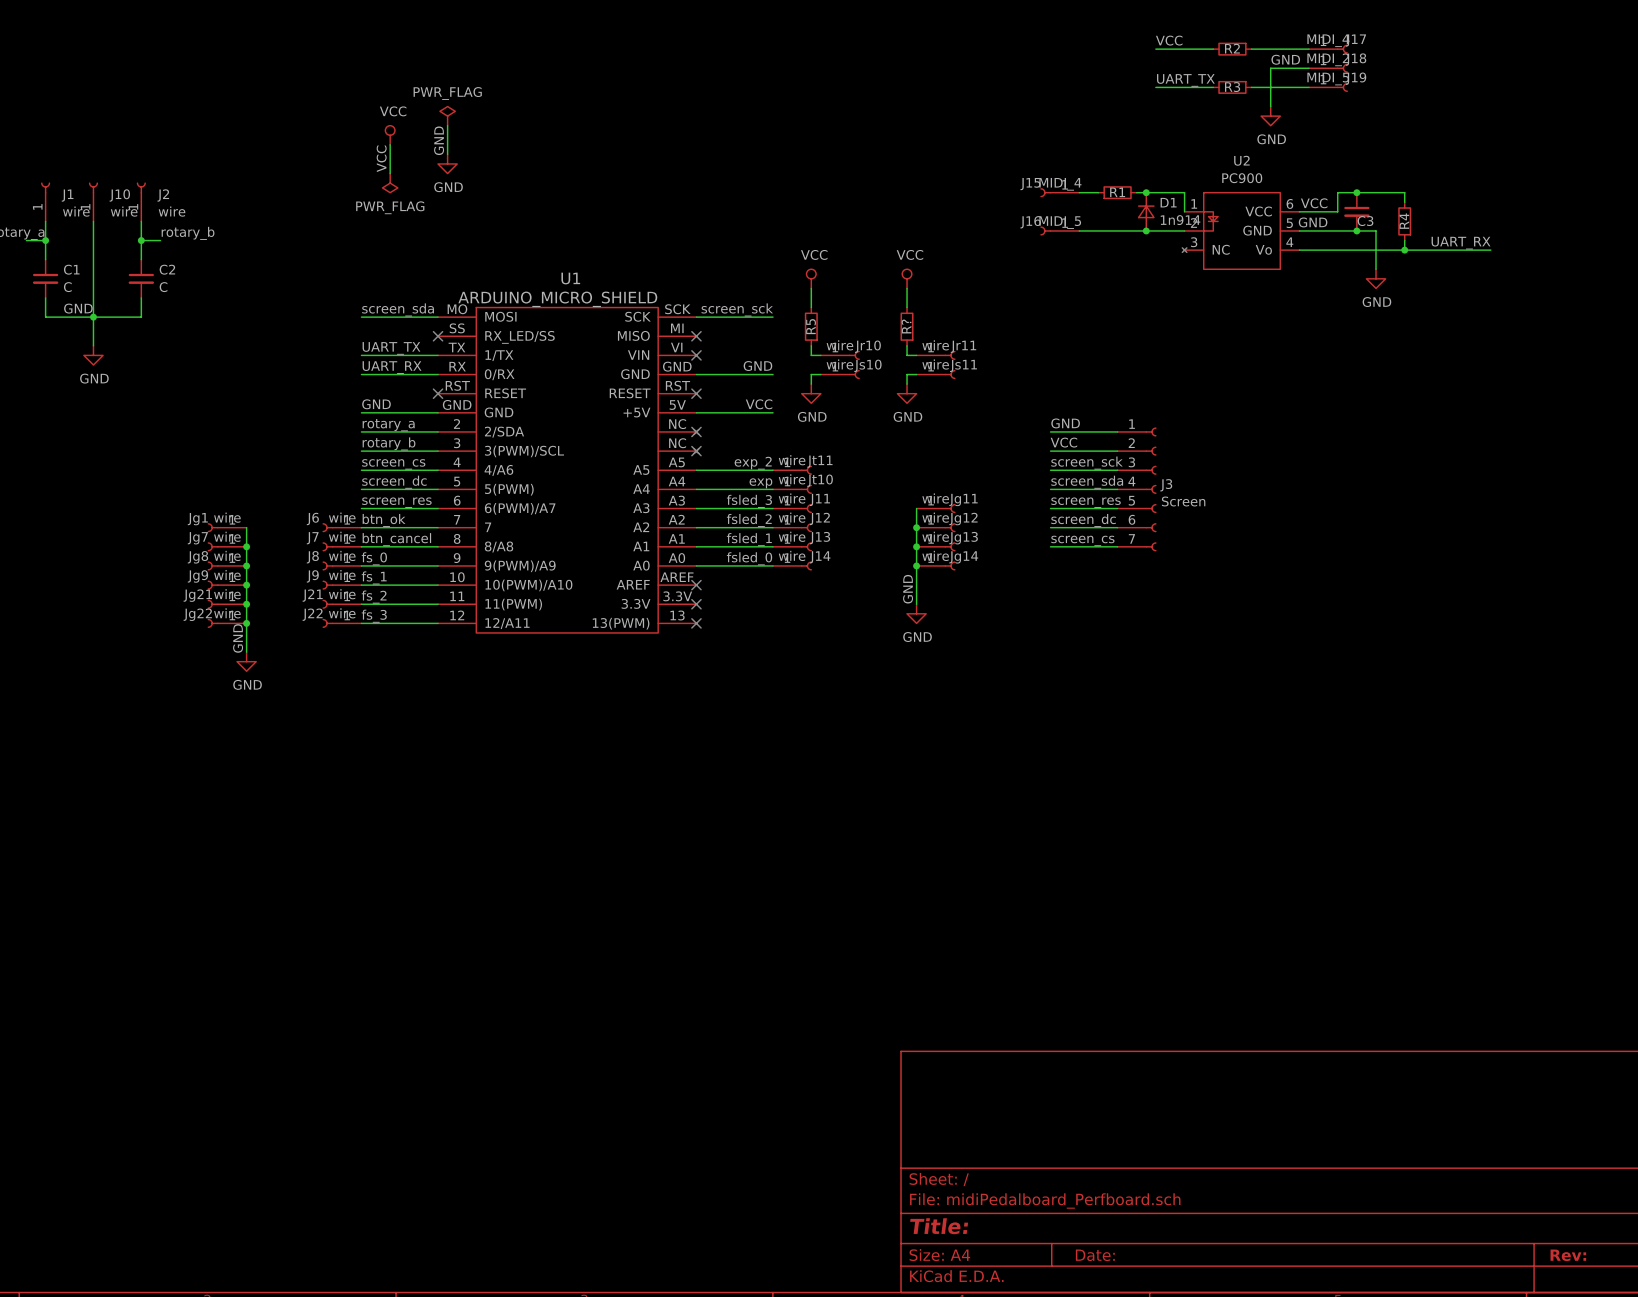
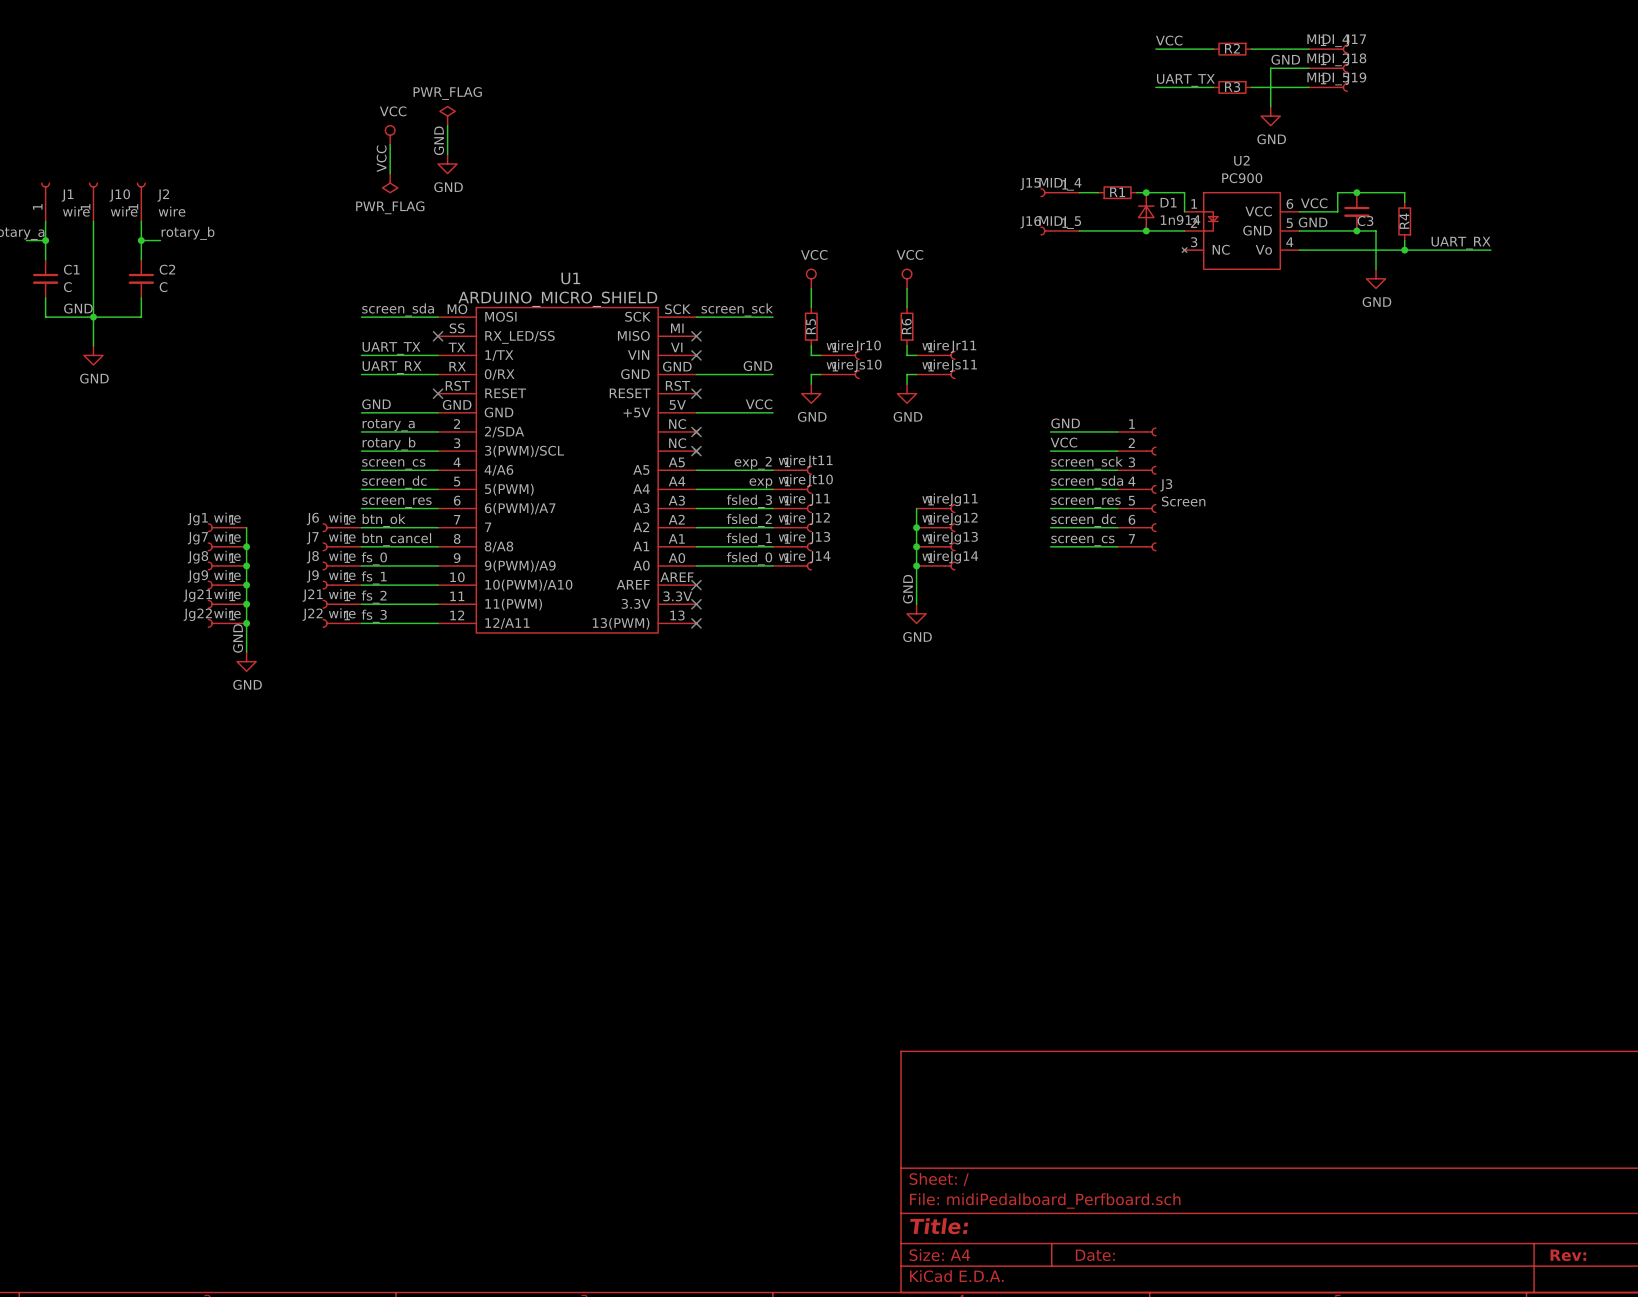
R? name: R? (906, 326) -> R6 (906, 326)

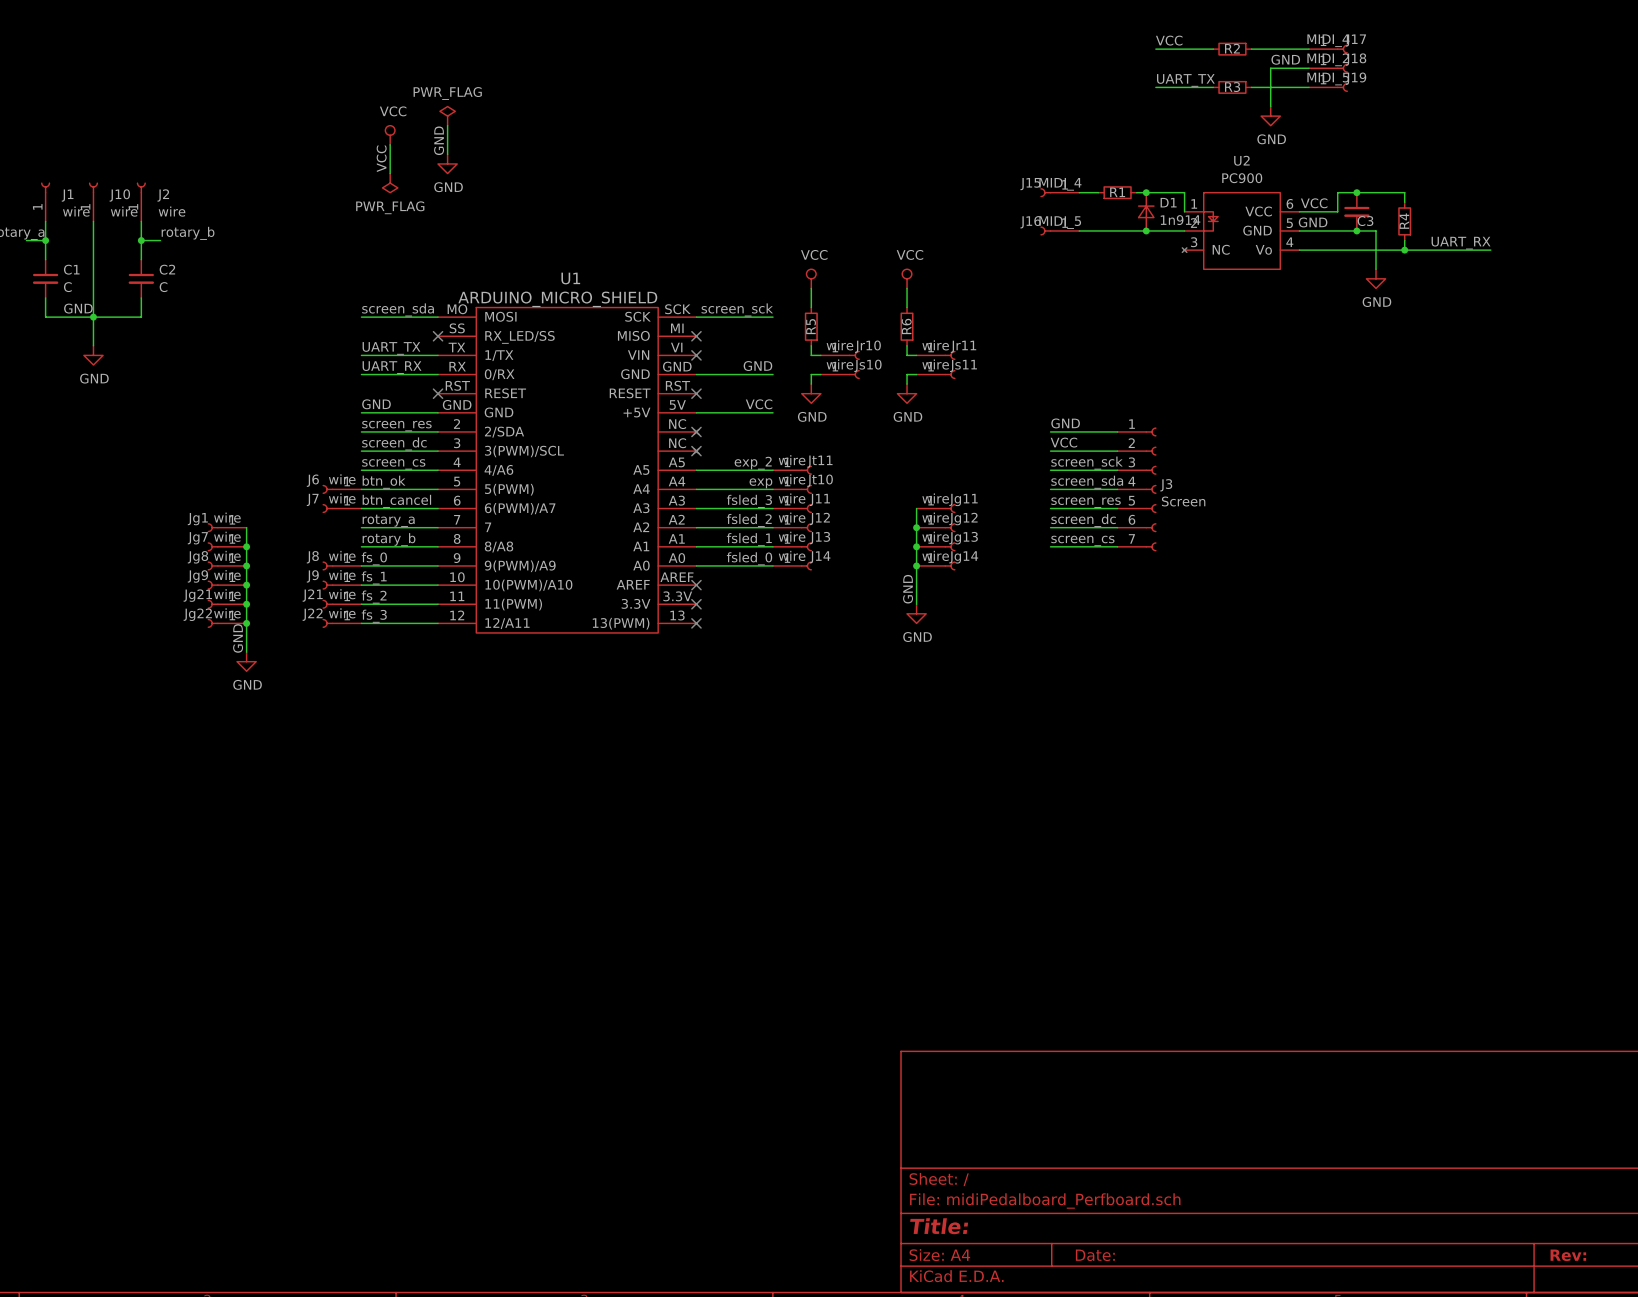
label: rotary_a (388, 425) -> screen_res (396, 426)
label: rotary_b (389, 443) -> screen_dc (394, 443)
label: screen_dc (394, 482) -> btn_ok (384, 482)
label: screen_res (396, 502) -> btn_cancel (396, 501)
label: btn_ok (384, 520) -> rotary_a (388, 520)
J6 position: (342, 527) -> (342, 489)
label: btn_cancel (396, 539) -> rotary_b (389, 539)
J7 position: (342, 546) -> (342, 508)

